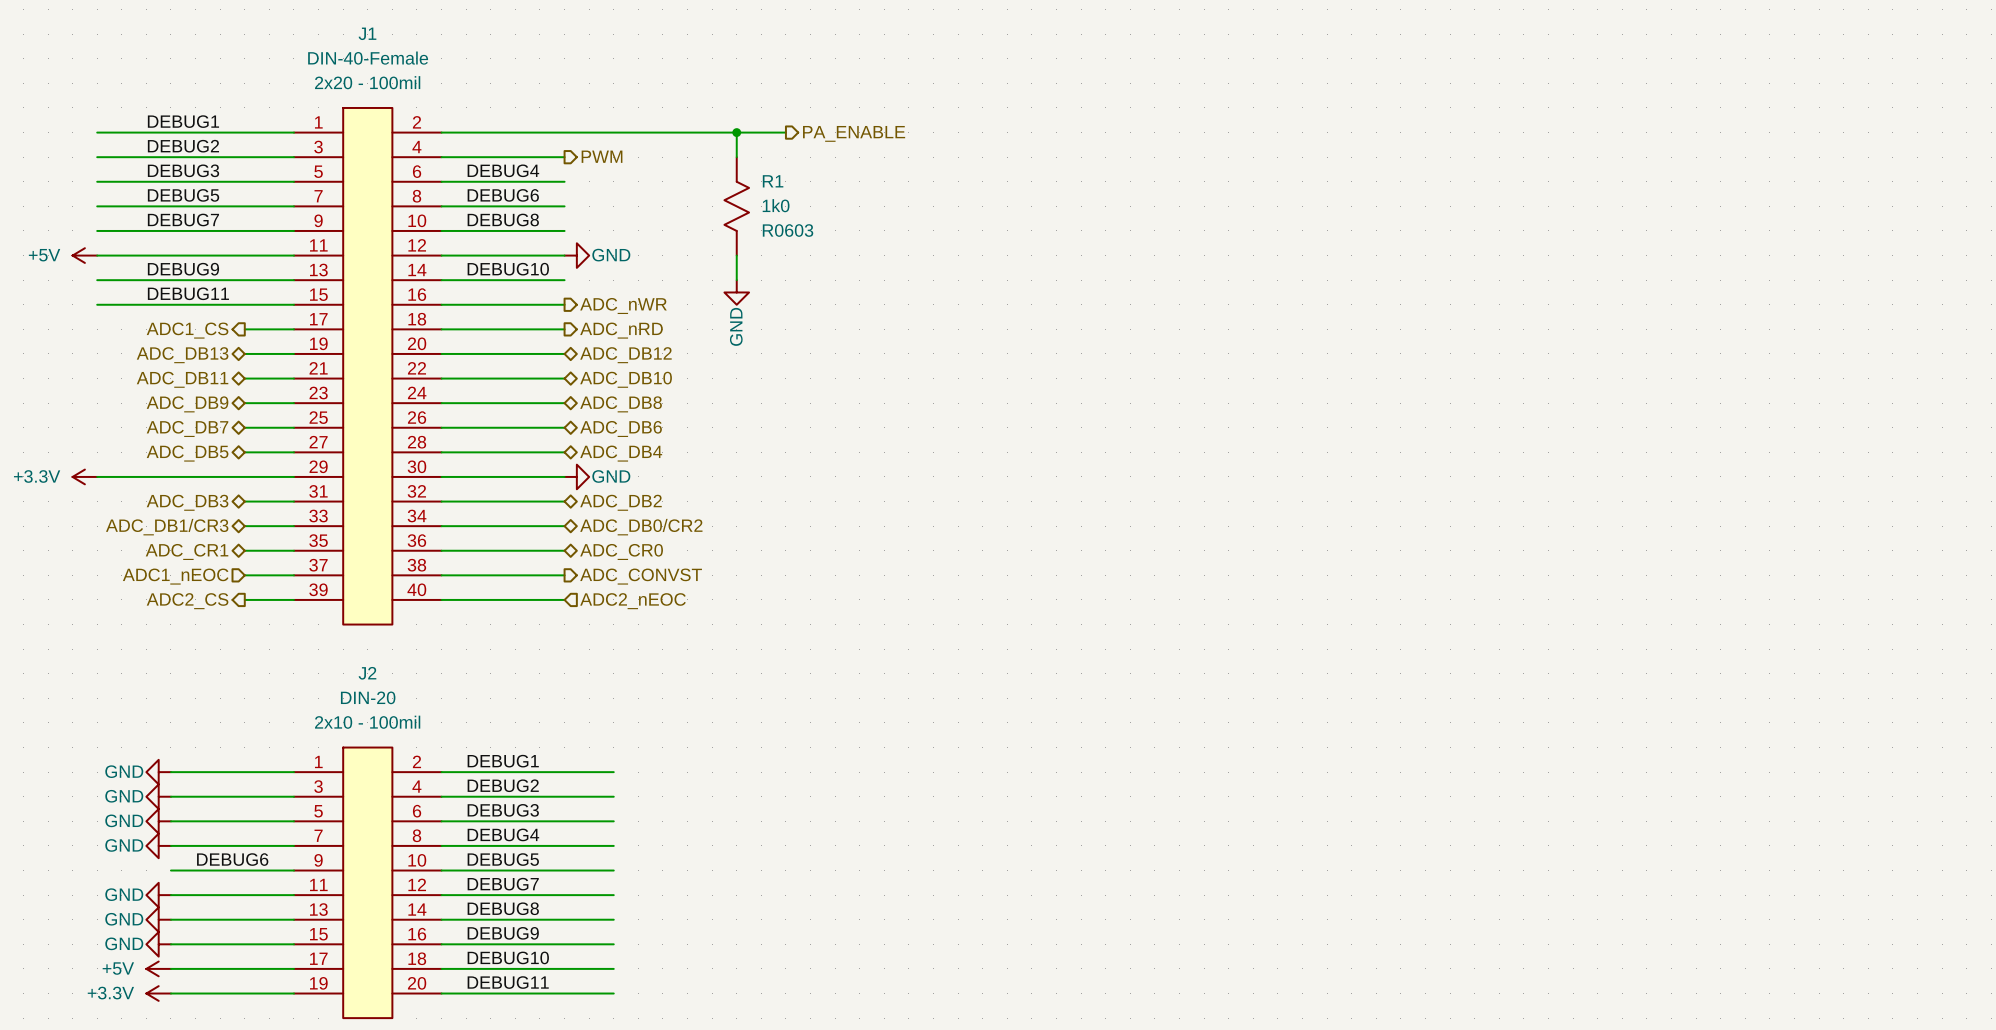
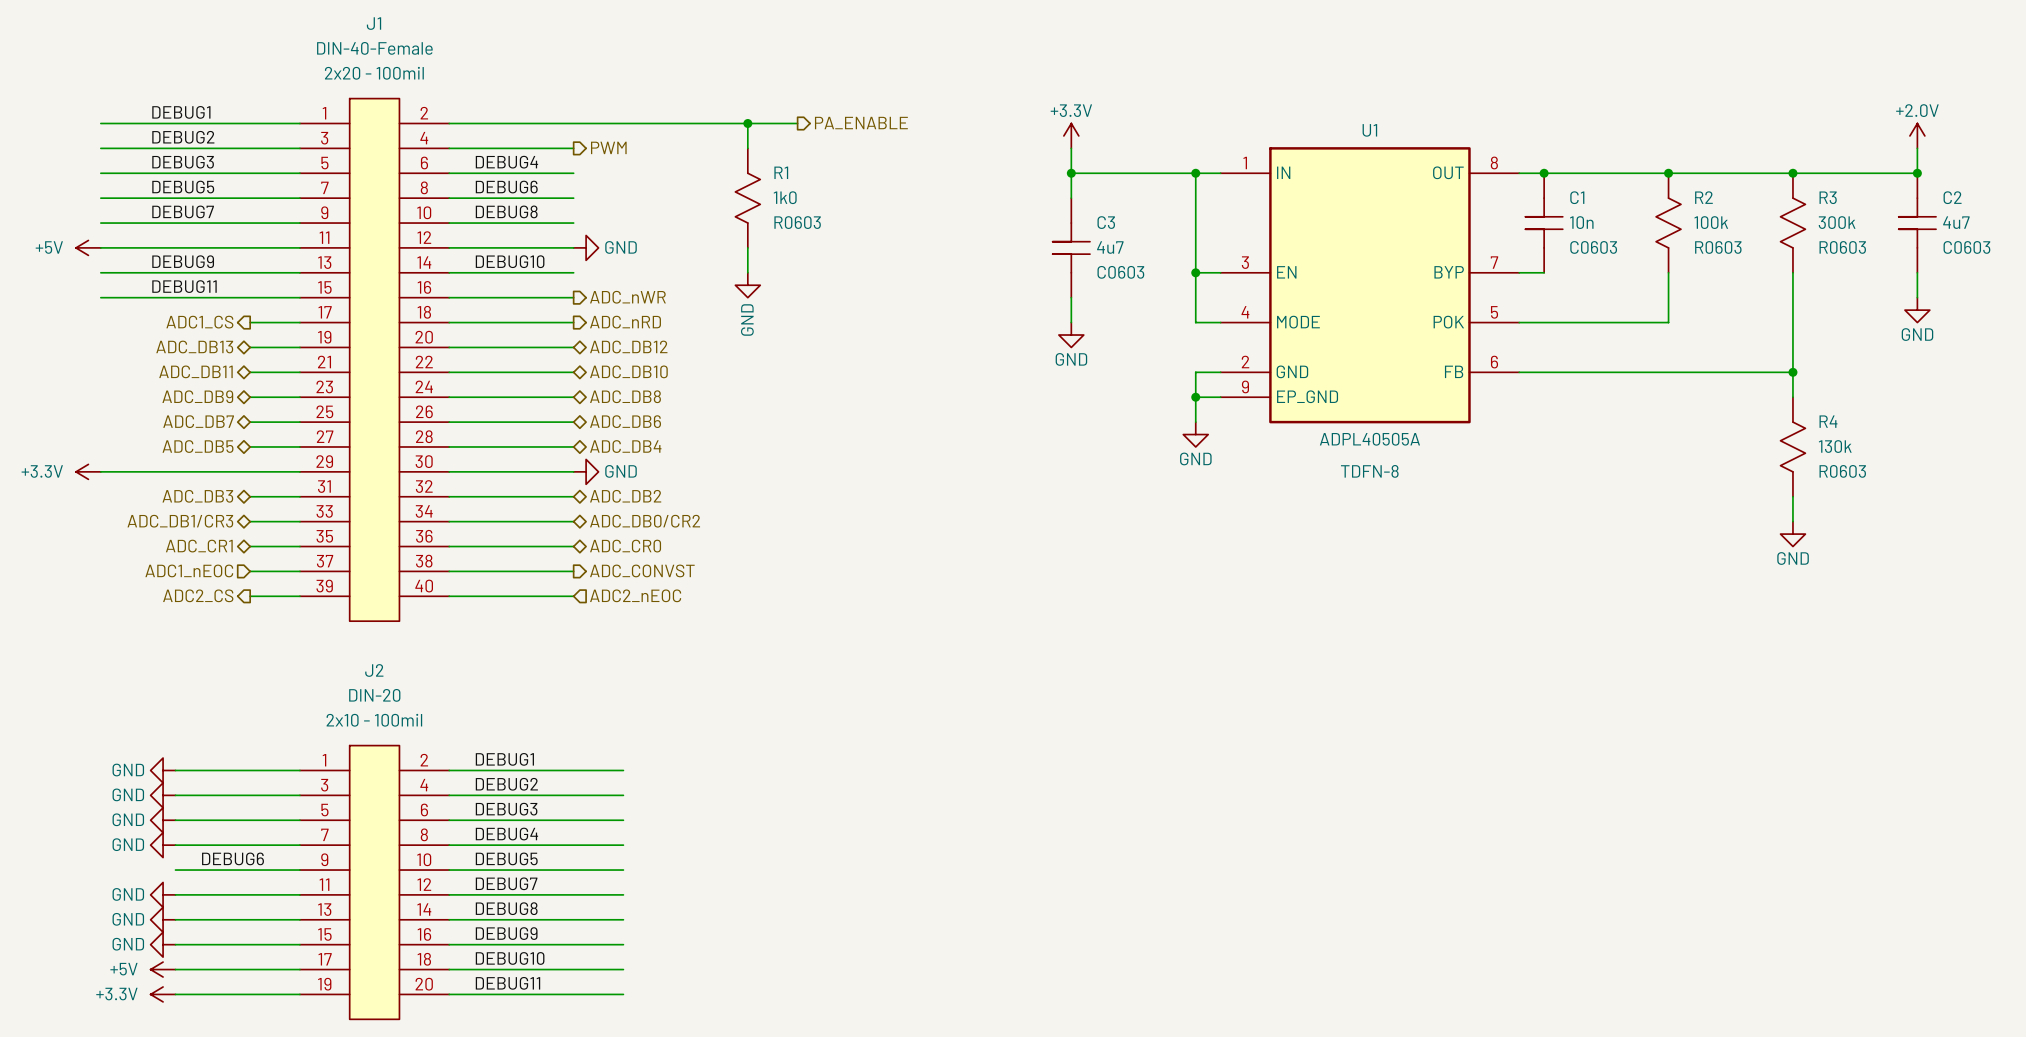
power symbol: none -> +3.3V (1071, 135)
power symbol: none -> +2.0V (1917, 135)
wire: none -> (1071, 148) (1071, 198)
wire: none -> (1917, 148) (1917, 173) (1519, 173)
wire: none -> (1071, 173) (1220, 173)
junction: none -> (1071, 173)
wire: none -> (1195, 173) (1195, 322) (1220, 322)
junction: none -> (1195, 173)
junction: none -> (1544, 173)
junction: none -> (1668, 173)
junction: none -> (1792, 173)
junction: none -> (1917, 173)
C1: none -> (1544, 223)
R2: none -> (1668, 223)
R3: none -> (1792, 223)
C2: none -> (1917, 223)
C3: none -> (1071, 247)
wire: none -> (1195, 272) (1220, 272)
junction: none -> (1195, 272)
wire: none -> (1519, 272) (1544, 272)
wire: none -> (1668, 272) (1668, 322) (1519, 322)
wire: none -> (1792, 272) (1792, 397)
wire: none -> (1917, 272) (1917, 297)
U1: none -> ADPL40505A (1369, 285)
wire: none -> (1071, 297) (1071, 322)
power symbol: none -> GND (1917, 310)
power symbol: none -> GND (1071, 335)
wire: none -> (1220, 372) (1195, 372) (1195, 422)
wire: none -> (1519, 372) (1792, 372)
junction: none -> (1792, 372)
wire: none -> (1195, 397) (1220, 397)
junction: none -> (1195, 397)
power symbol: none -> GND (1195, 434)
R4: none -> (1792, 446)
wire: none -> (1792, 496) (1792, 521)
power symbol: none -> GND (1792, 534)

